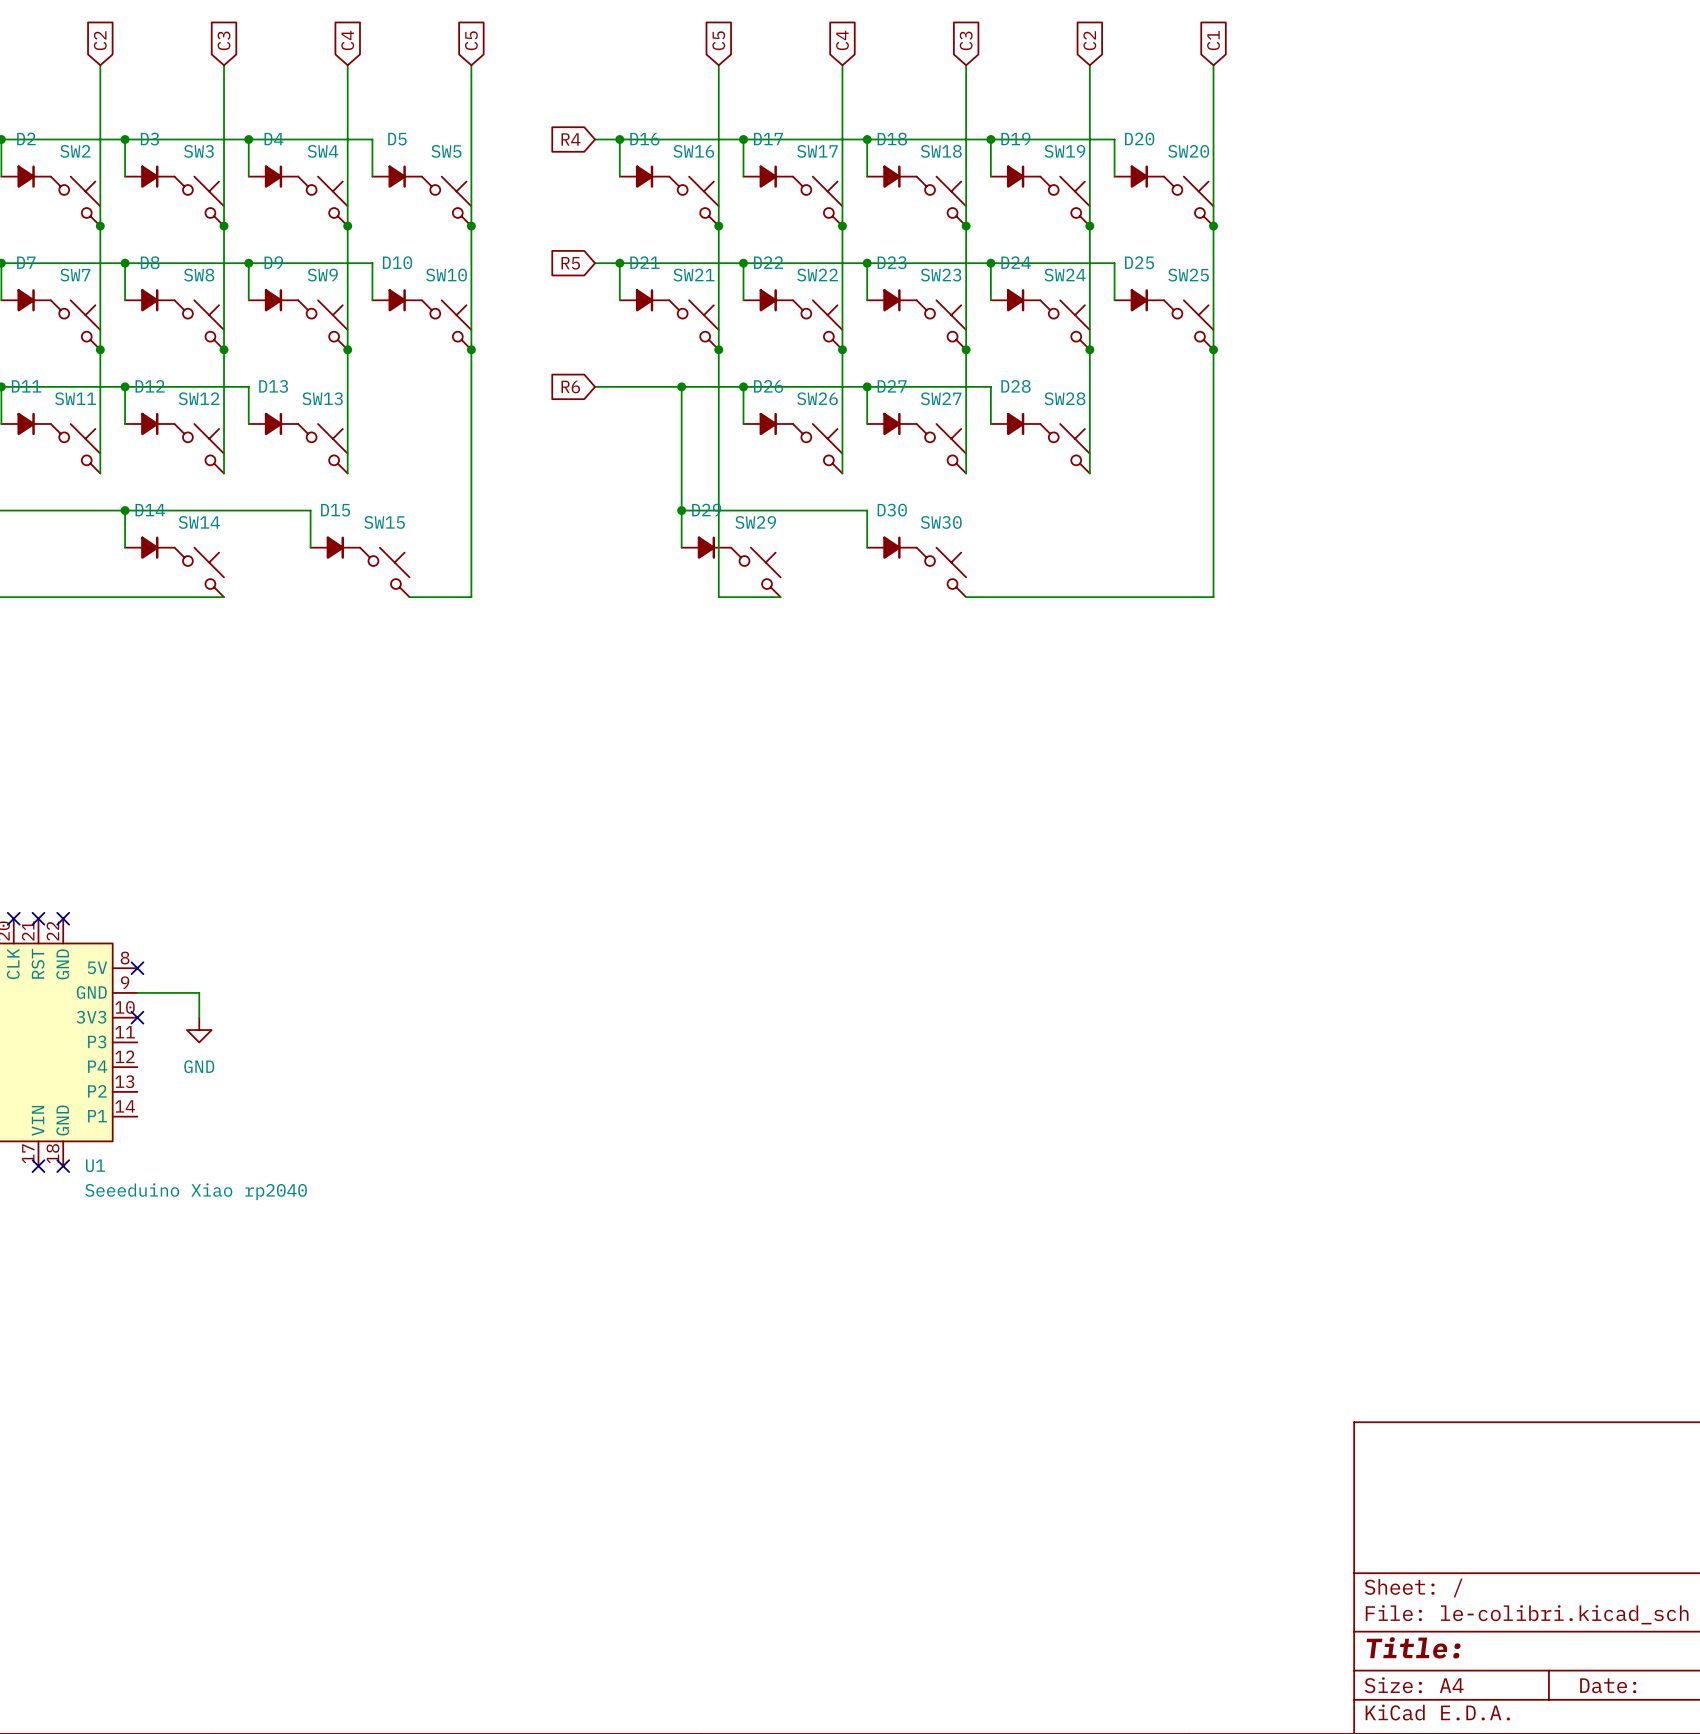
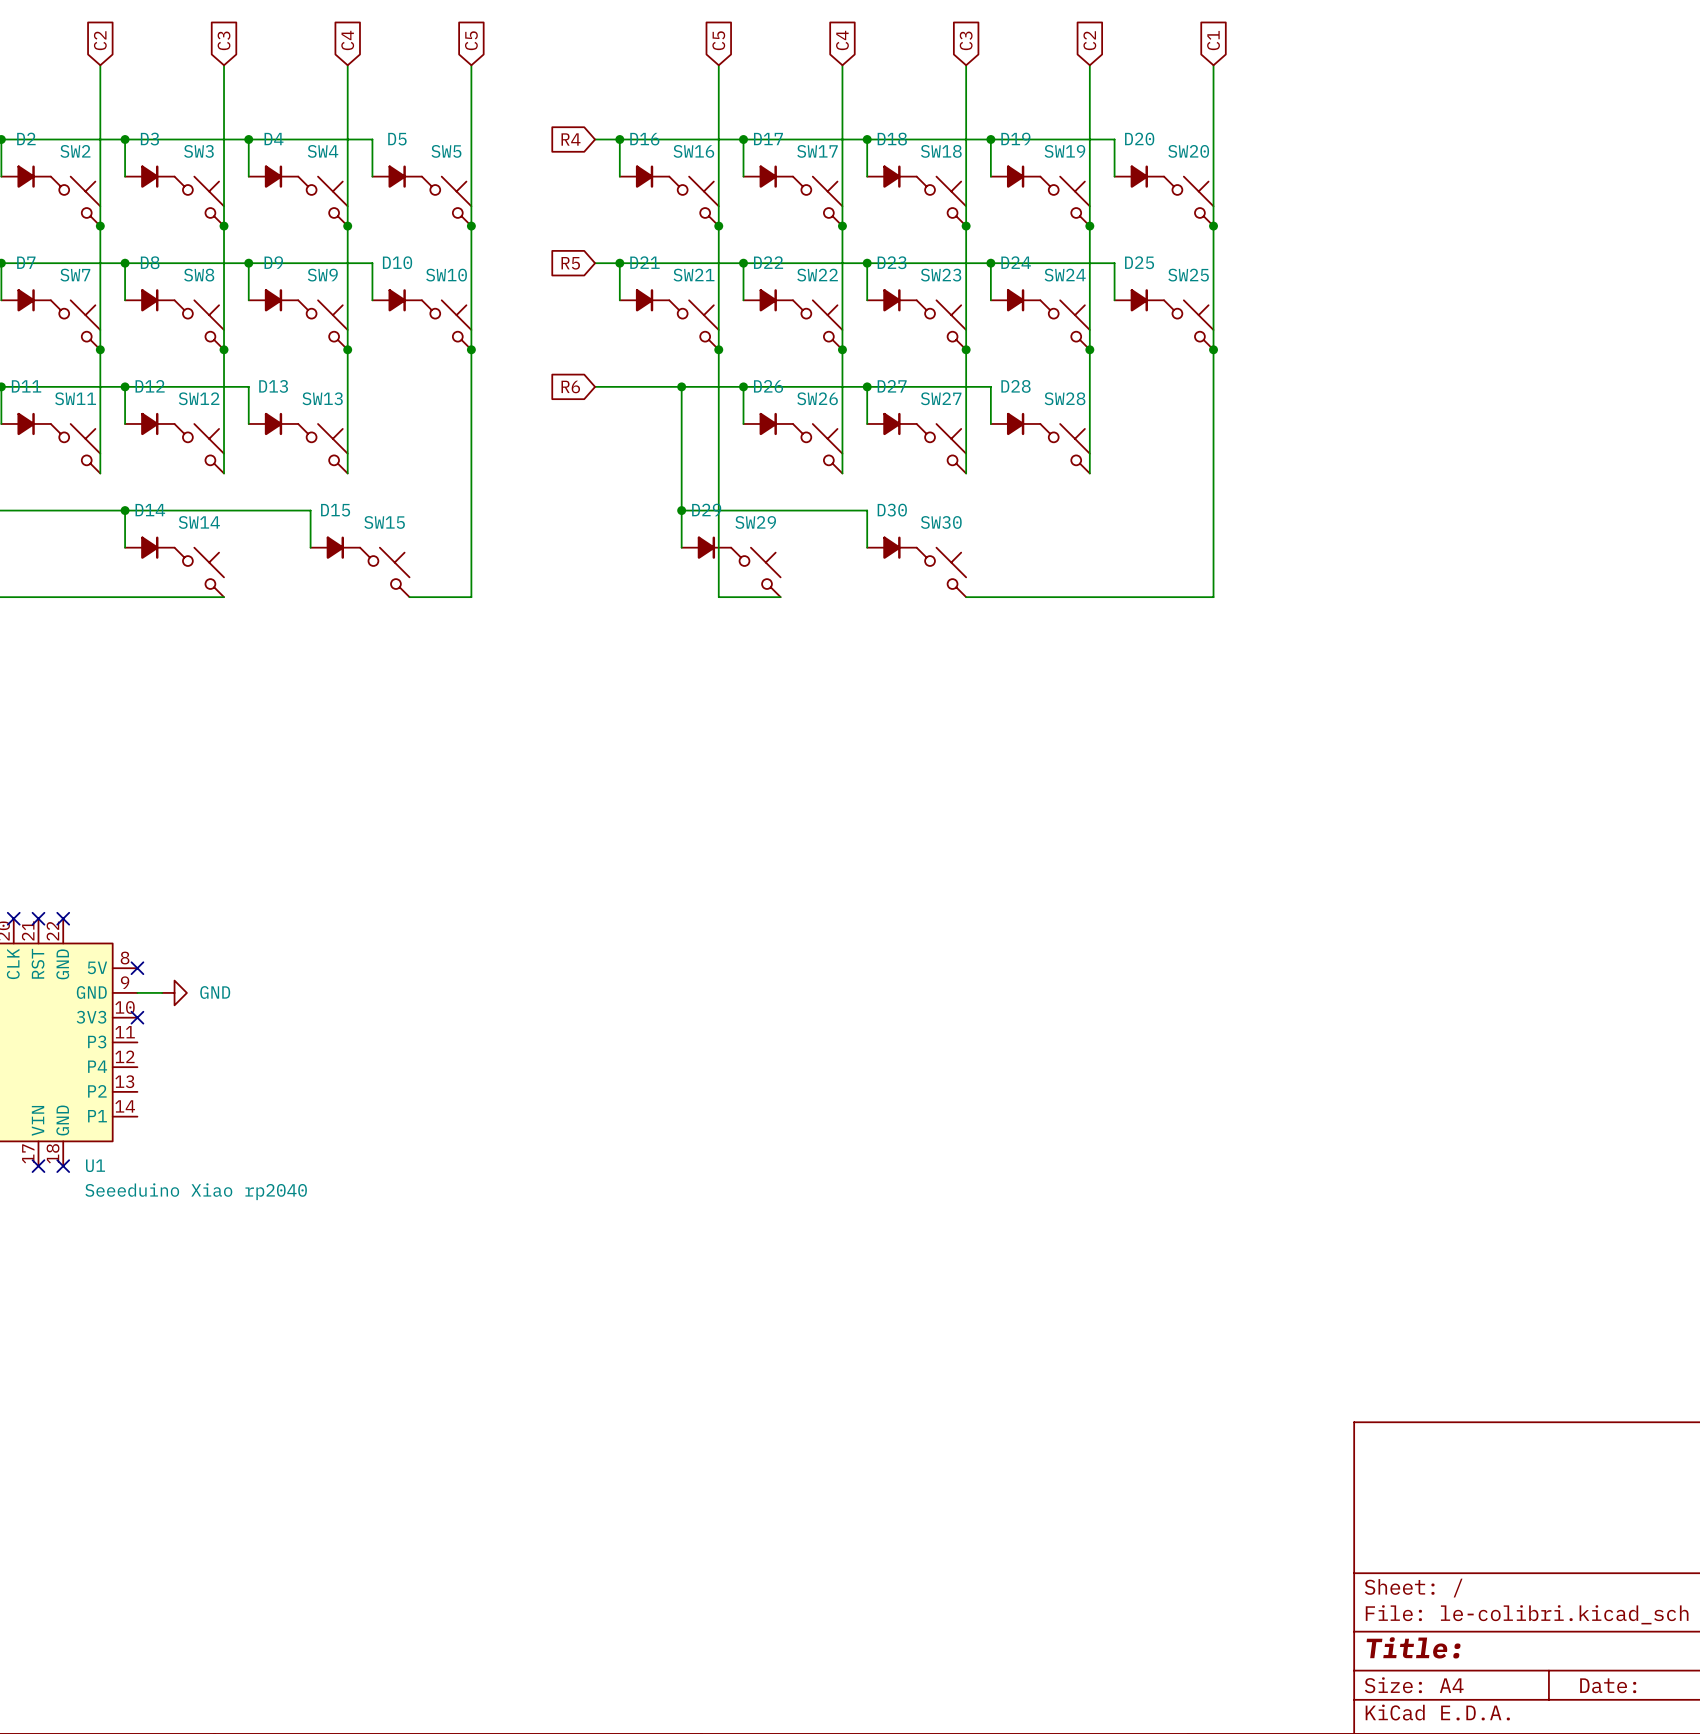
wire: (162, 992) (199, 992) (199, 1017) -> none
power symbol rotation: 0° (199, 1030) -> 90° counterclockwise (174, 992)
power symbol position: GND (199, 1030) -> GND (174, 992)

